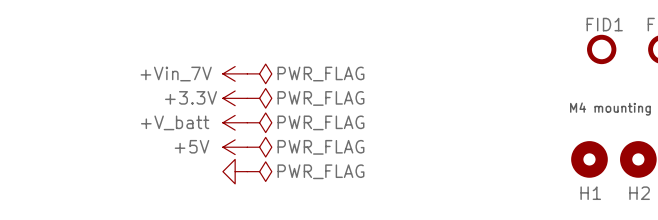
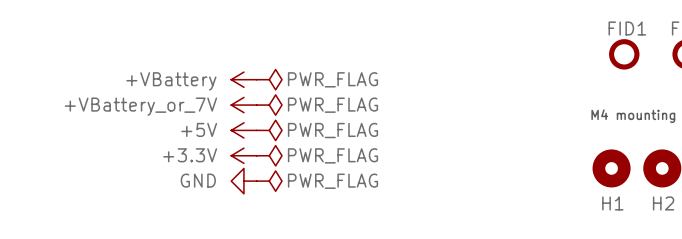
power symbol: +Vin_7V (235, 73) -> +VBattery (243, 79)
power symbol: +3.3V (235, 98) -> +VBattery_or_7V (243, 105)
power symbol: +V_batt (235, 122) -> +5V (243, 130)
power symbol: +5V (235, 147) -> +3.3V (243, 155)
power symbol text: none -> GND (198, 180)

